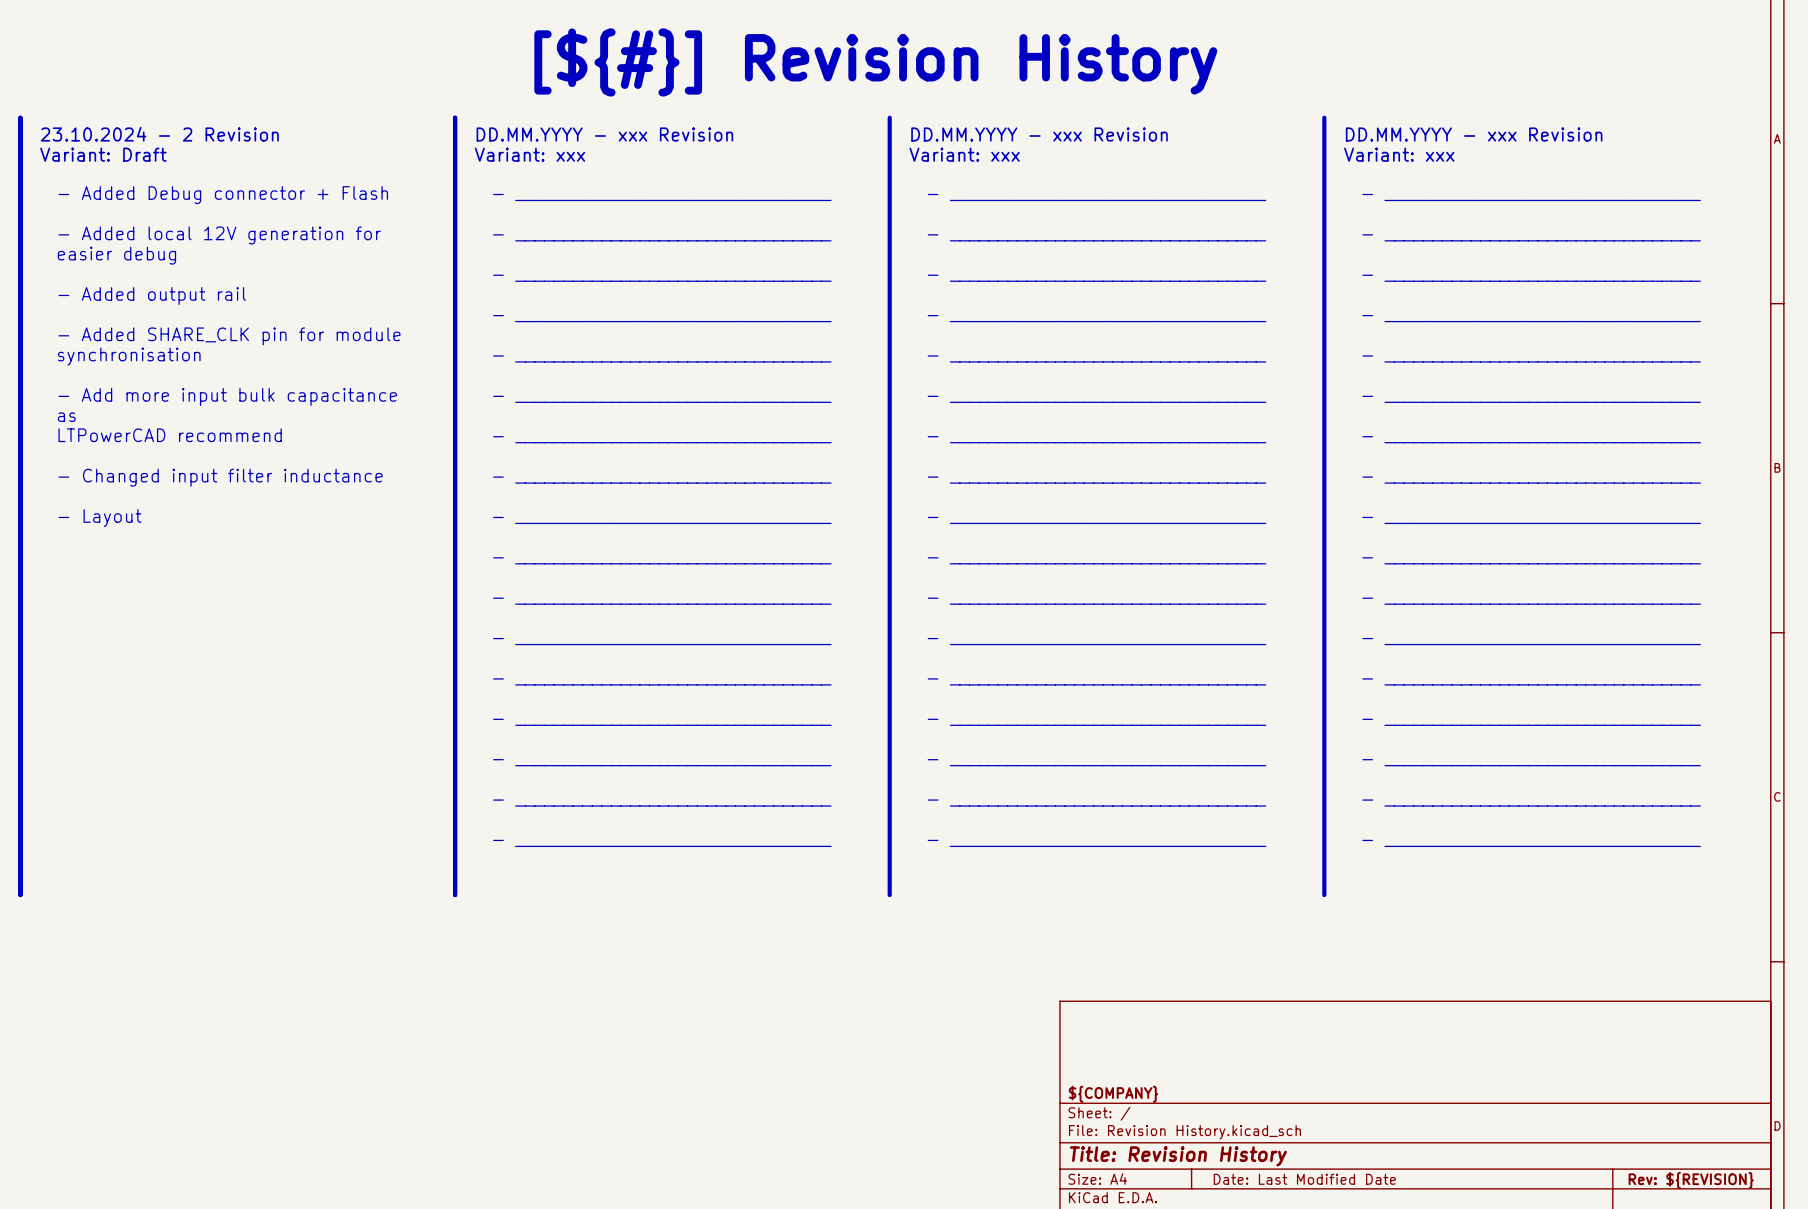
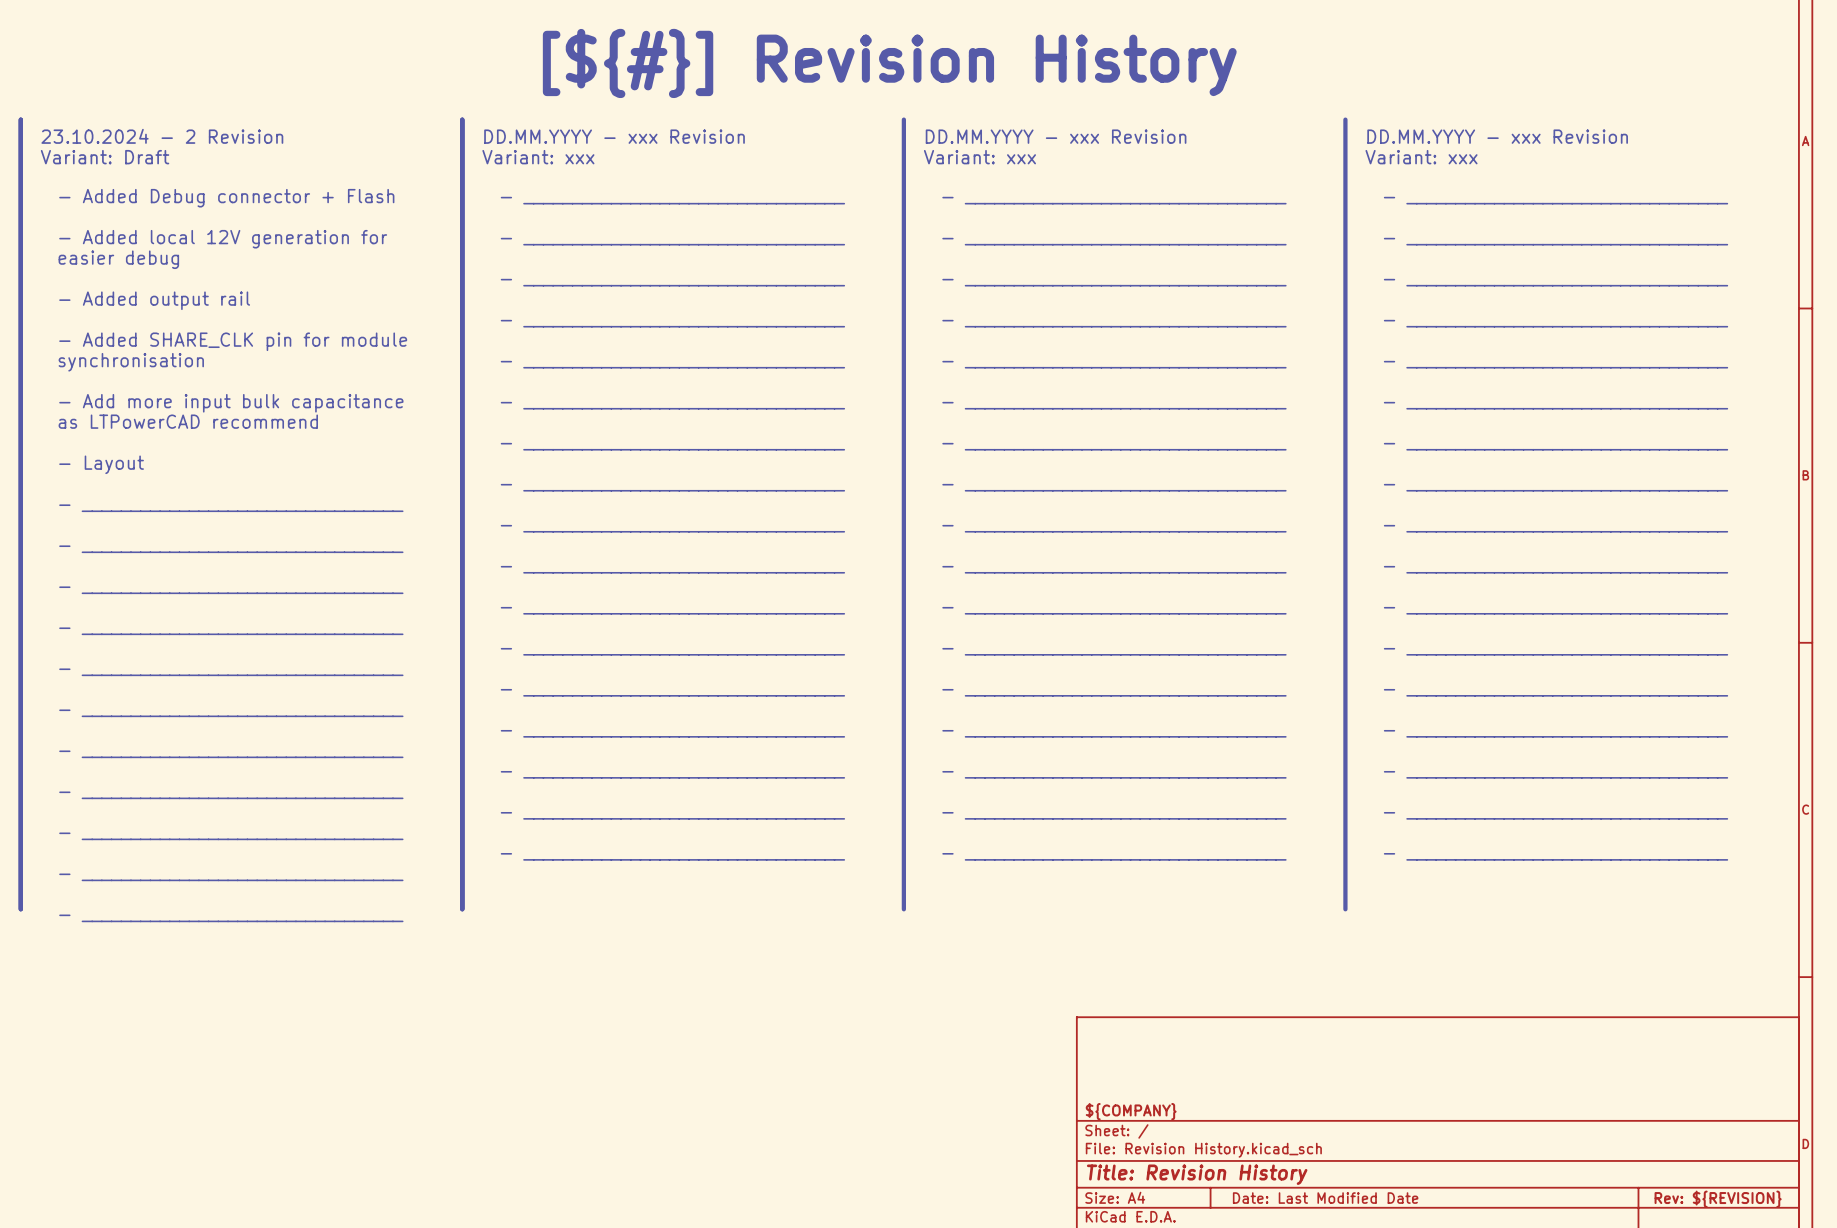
text: as (66, 417) -> as LTPowerCAD recommend (188, 421)
text: LTPowerCAD recommend (170, 435) -> none
text: - Changed input filter inductance (220, 477) -> none
text: none -> - _________________________________ (231, 508)
text position: - Layout (99, 518) -> - Layout (101, 464)
text: none -> - _________________________________ (231, 549)
text: none -> - _________________________________ (231, 590)
text: none -> - _________________________________ (231, 631)
text: none -> - _________________________________ (231, 672)
text: none -> - _________________________________ (231, 713)
text: none -> - _________________________________ (231, 754)
text: none -> - _________________________________ (231, 795)
text: none -> - _________________________________ (231, 836)
text: none -> - _________________________________ (231, 877)
text: none -> - _________________________________ (231, 918)

